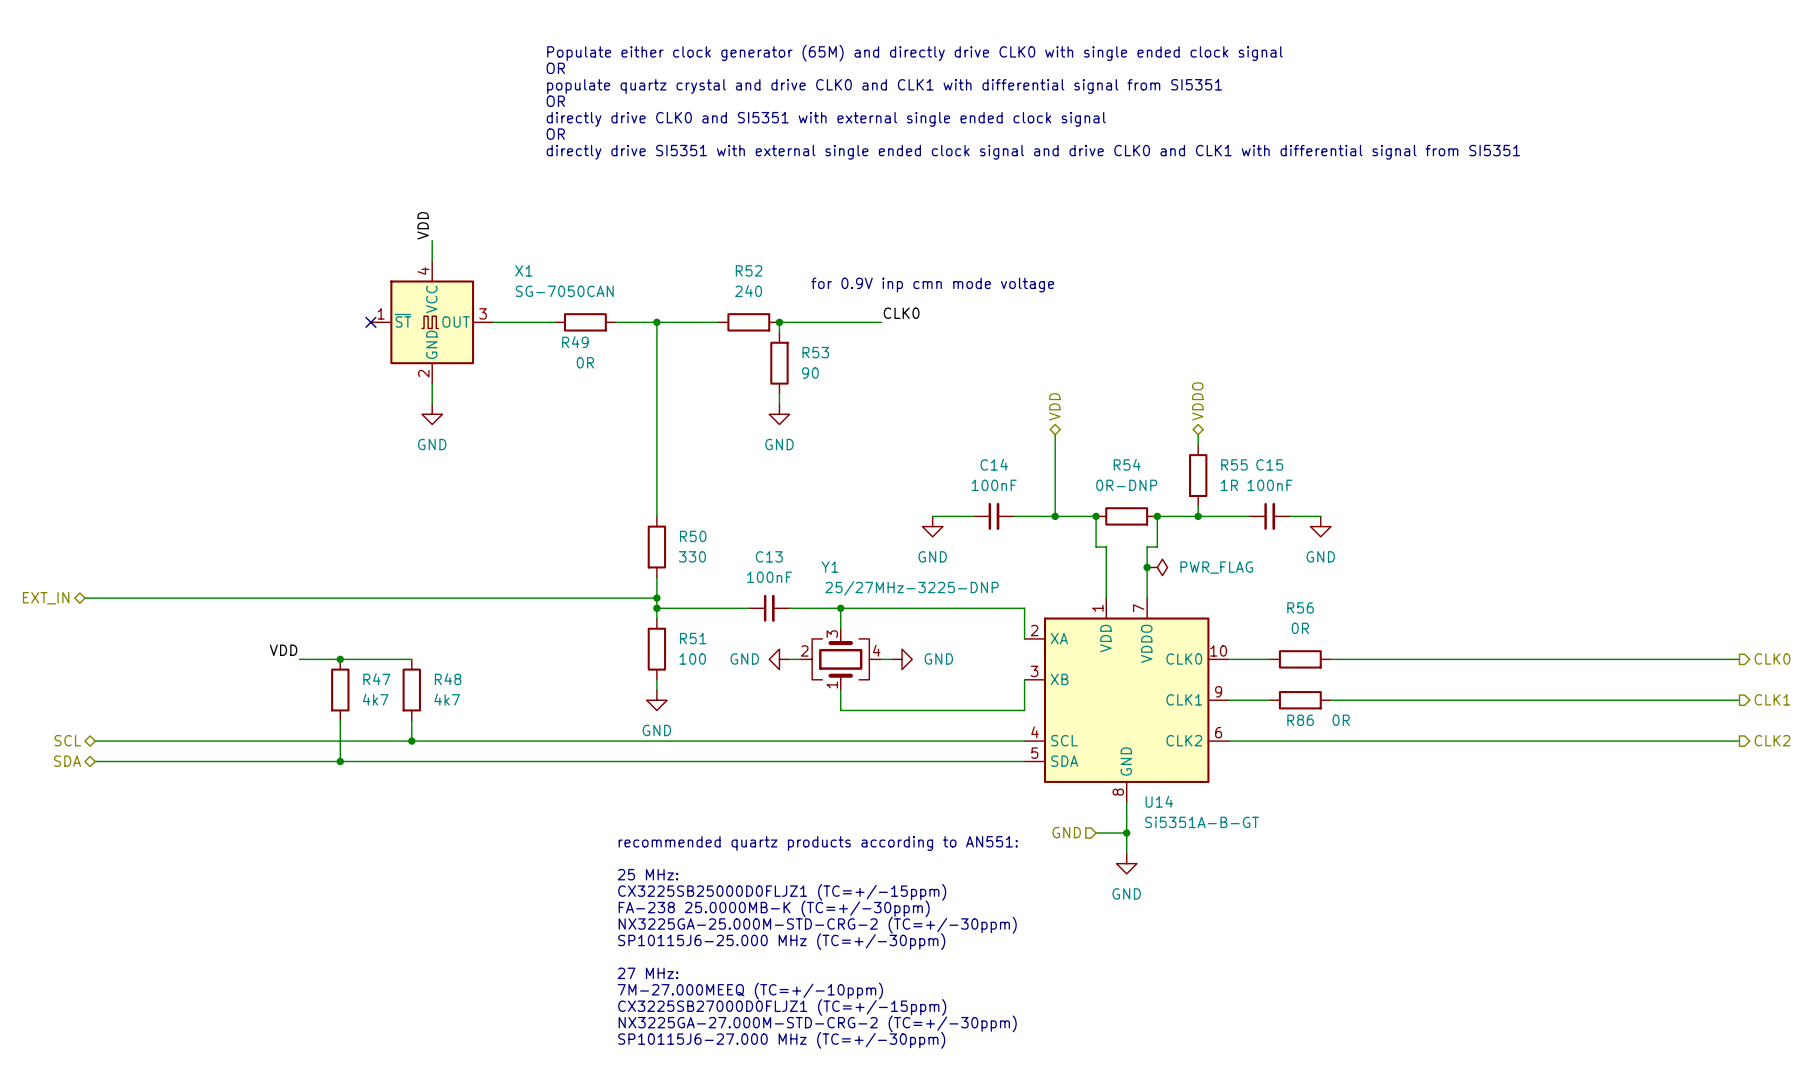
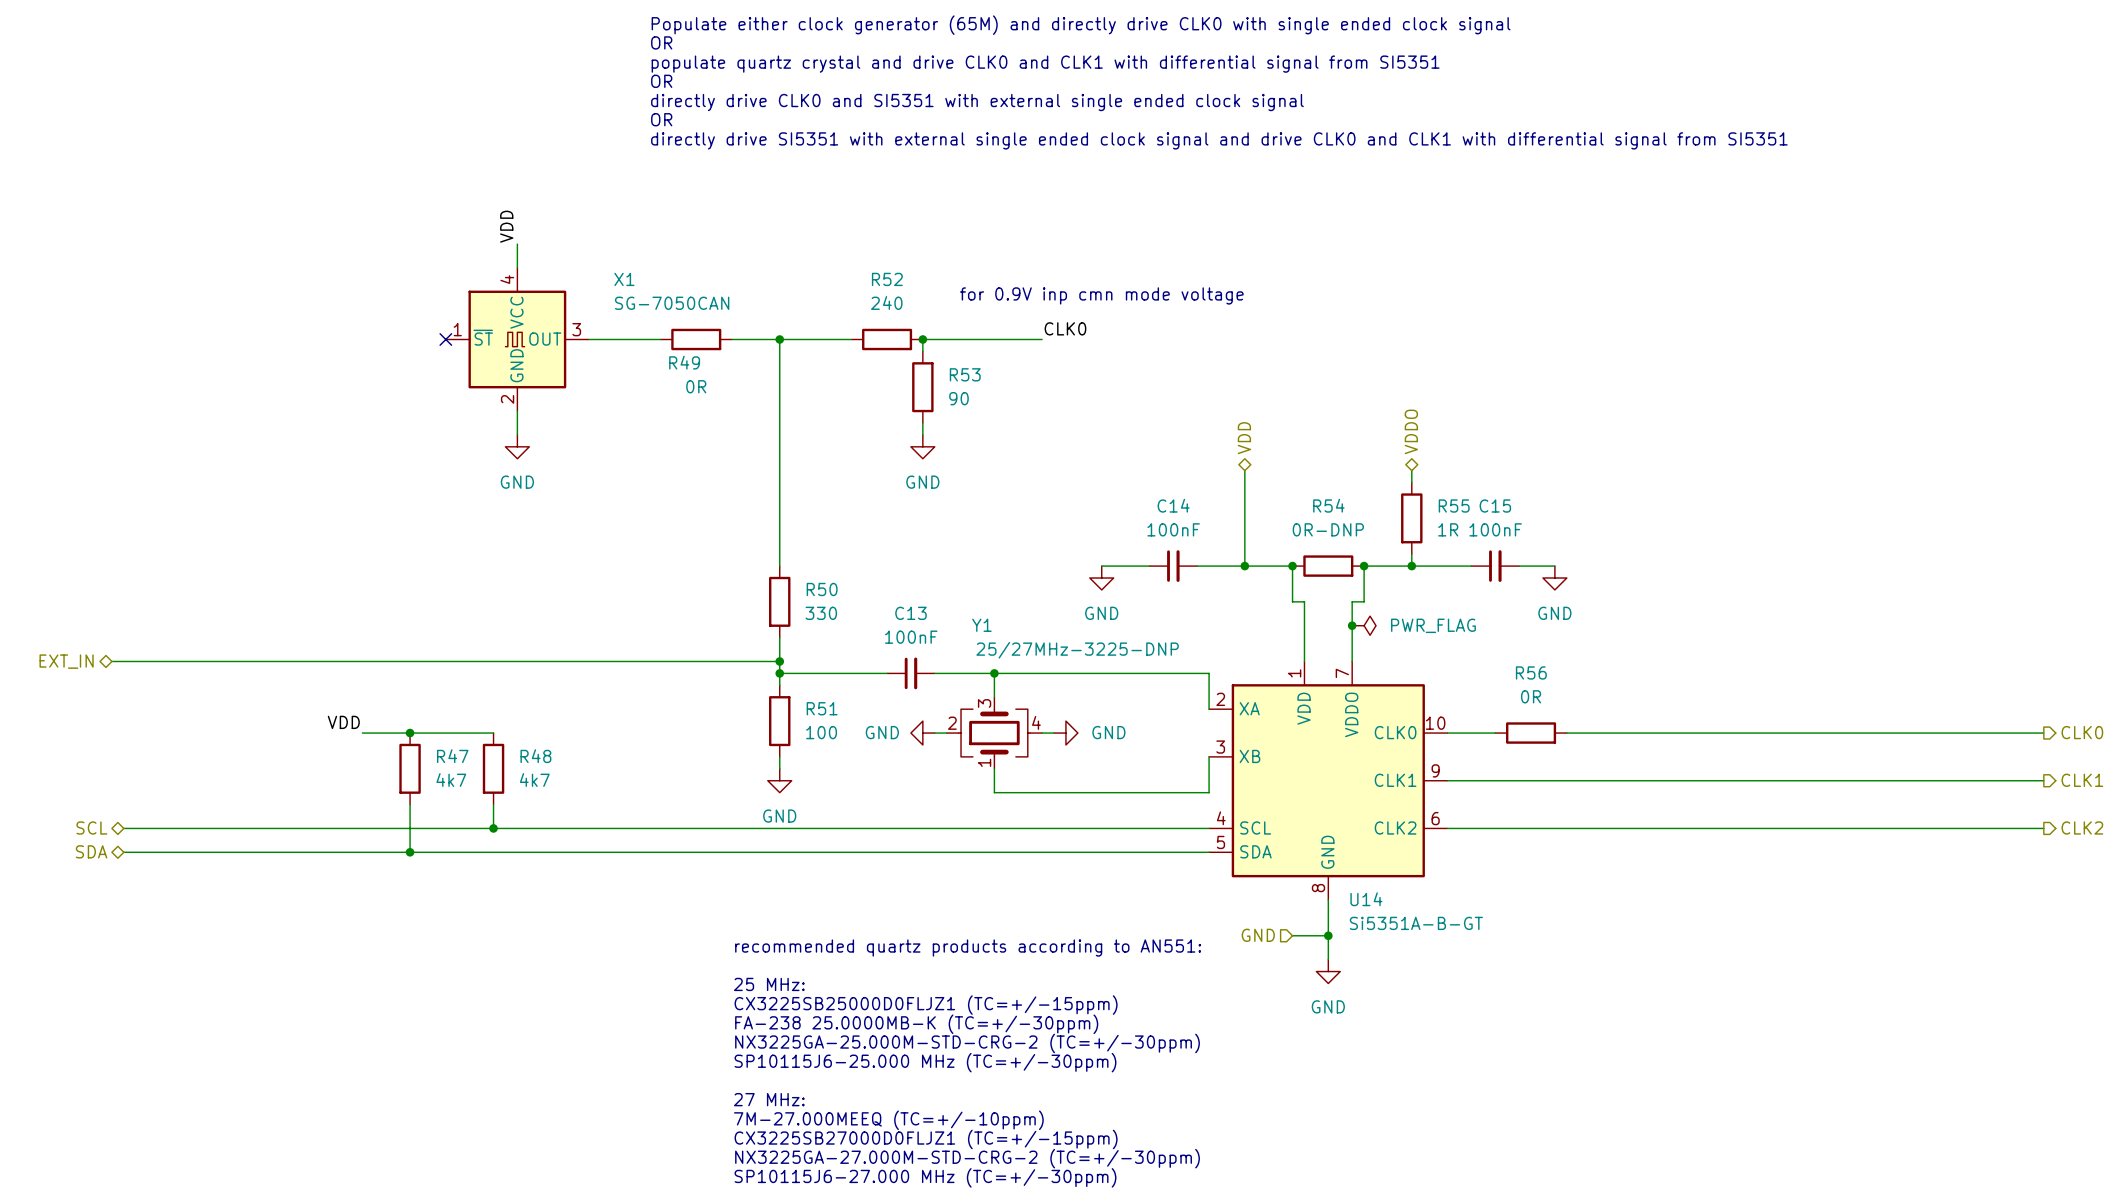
wire: none -> (1495, 780) (1566, 780)
R86: 0R (1300, 700) -> none

